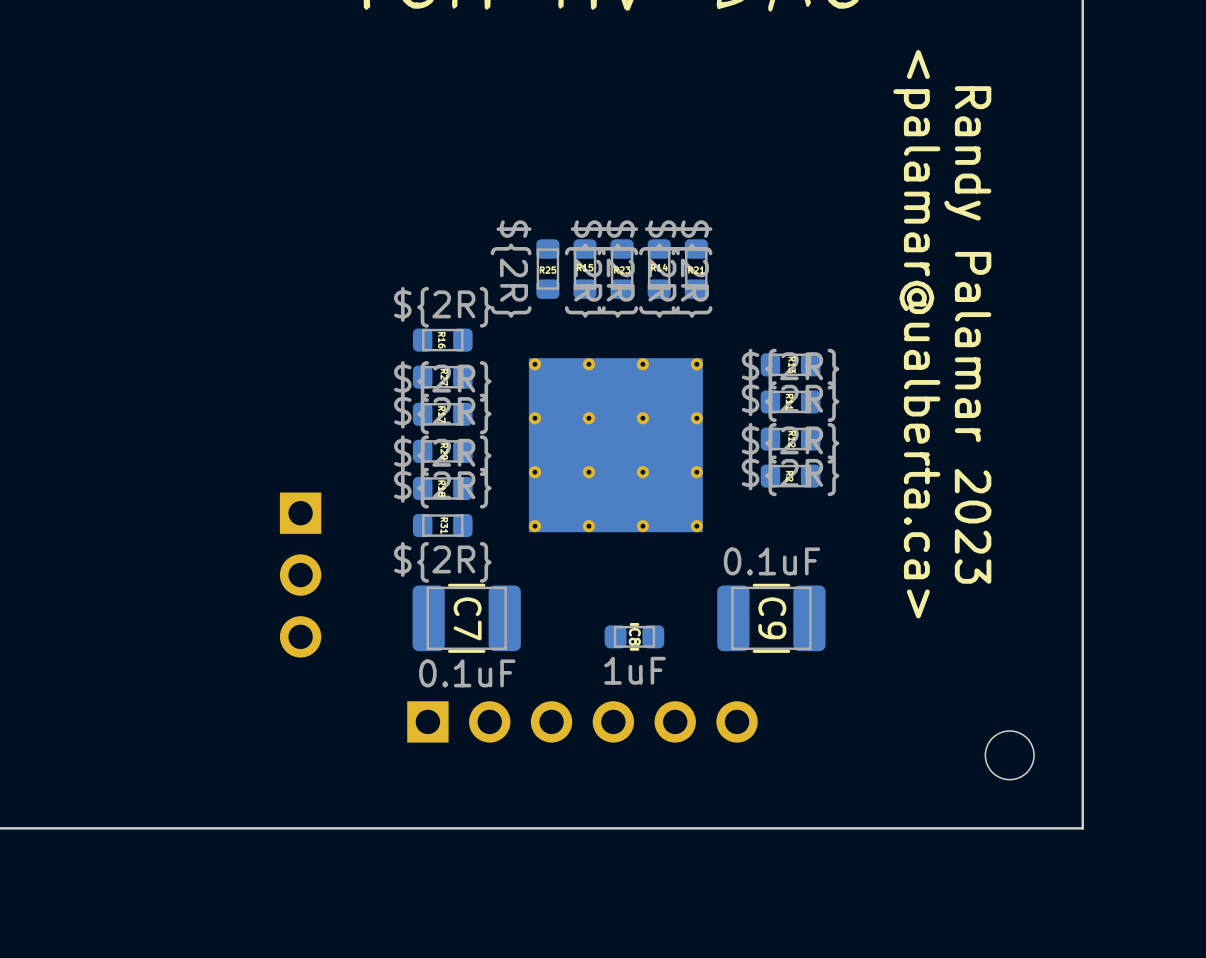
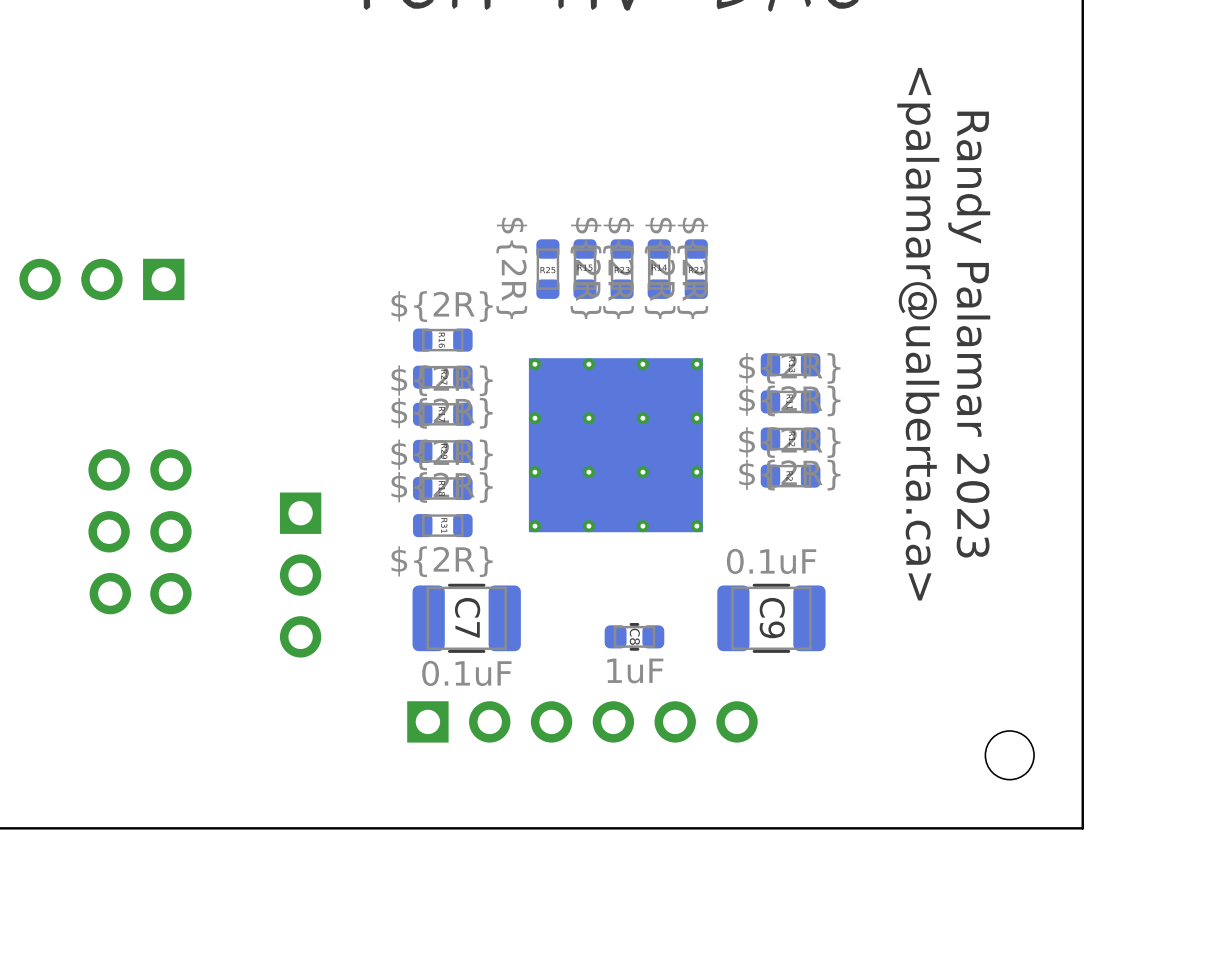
part: none -> (101, 279)
part: none -> (140, 531)

